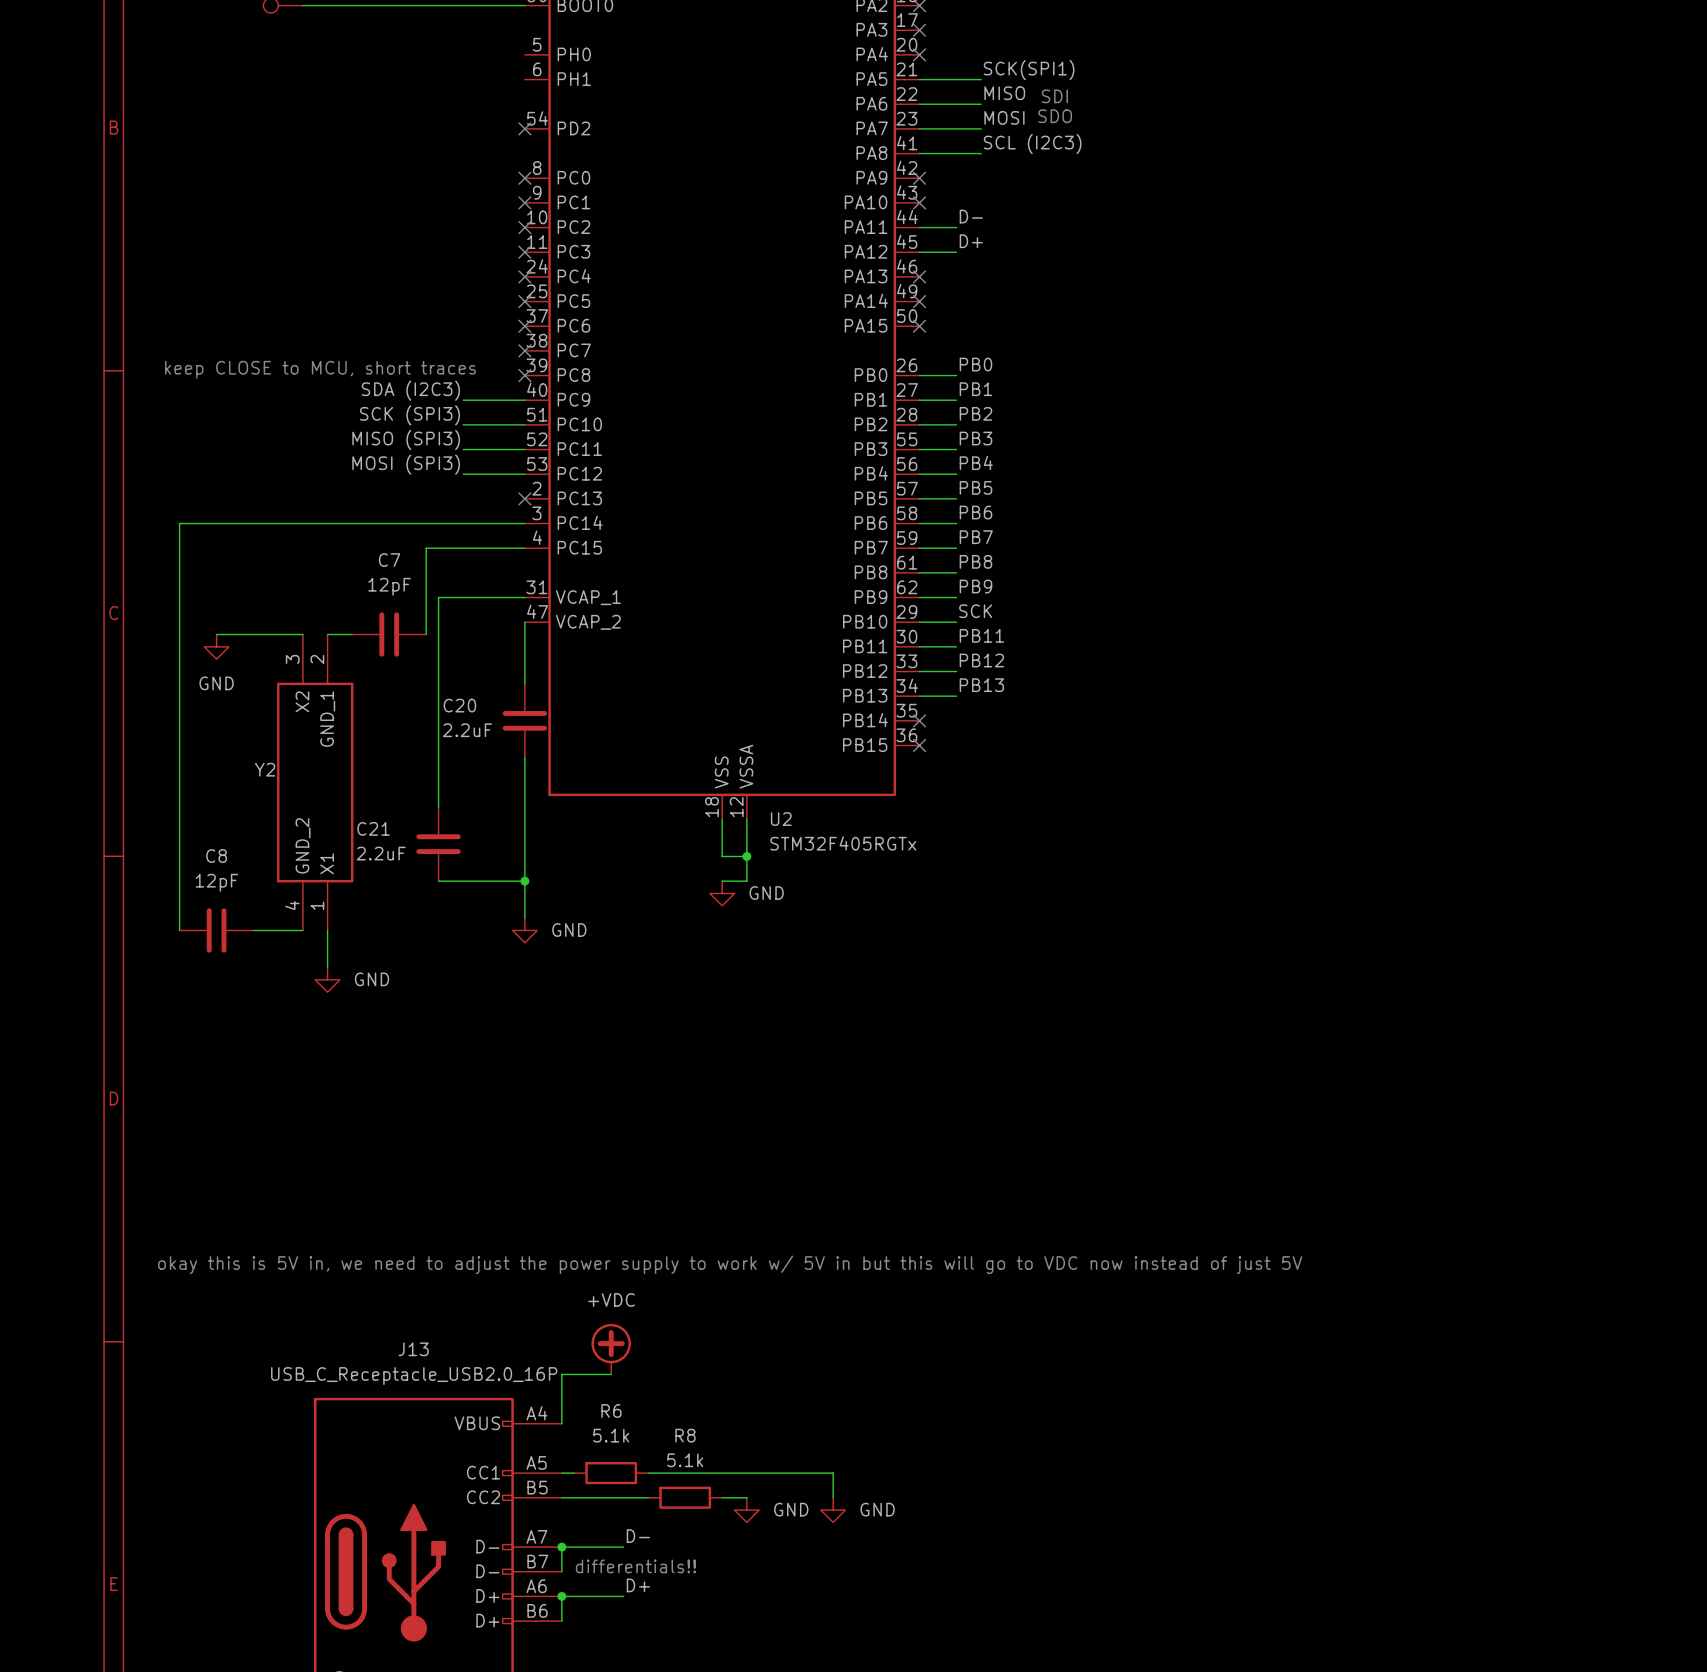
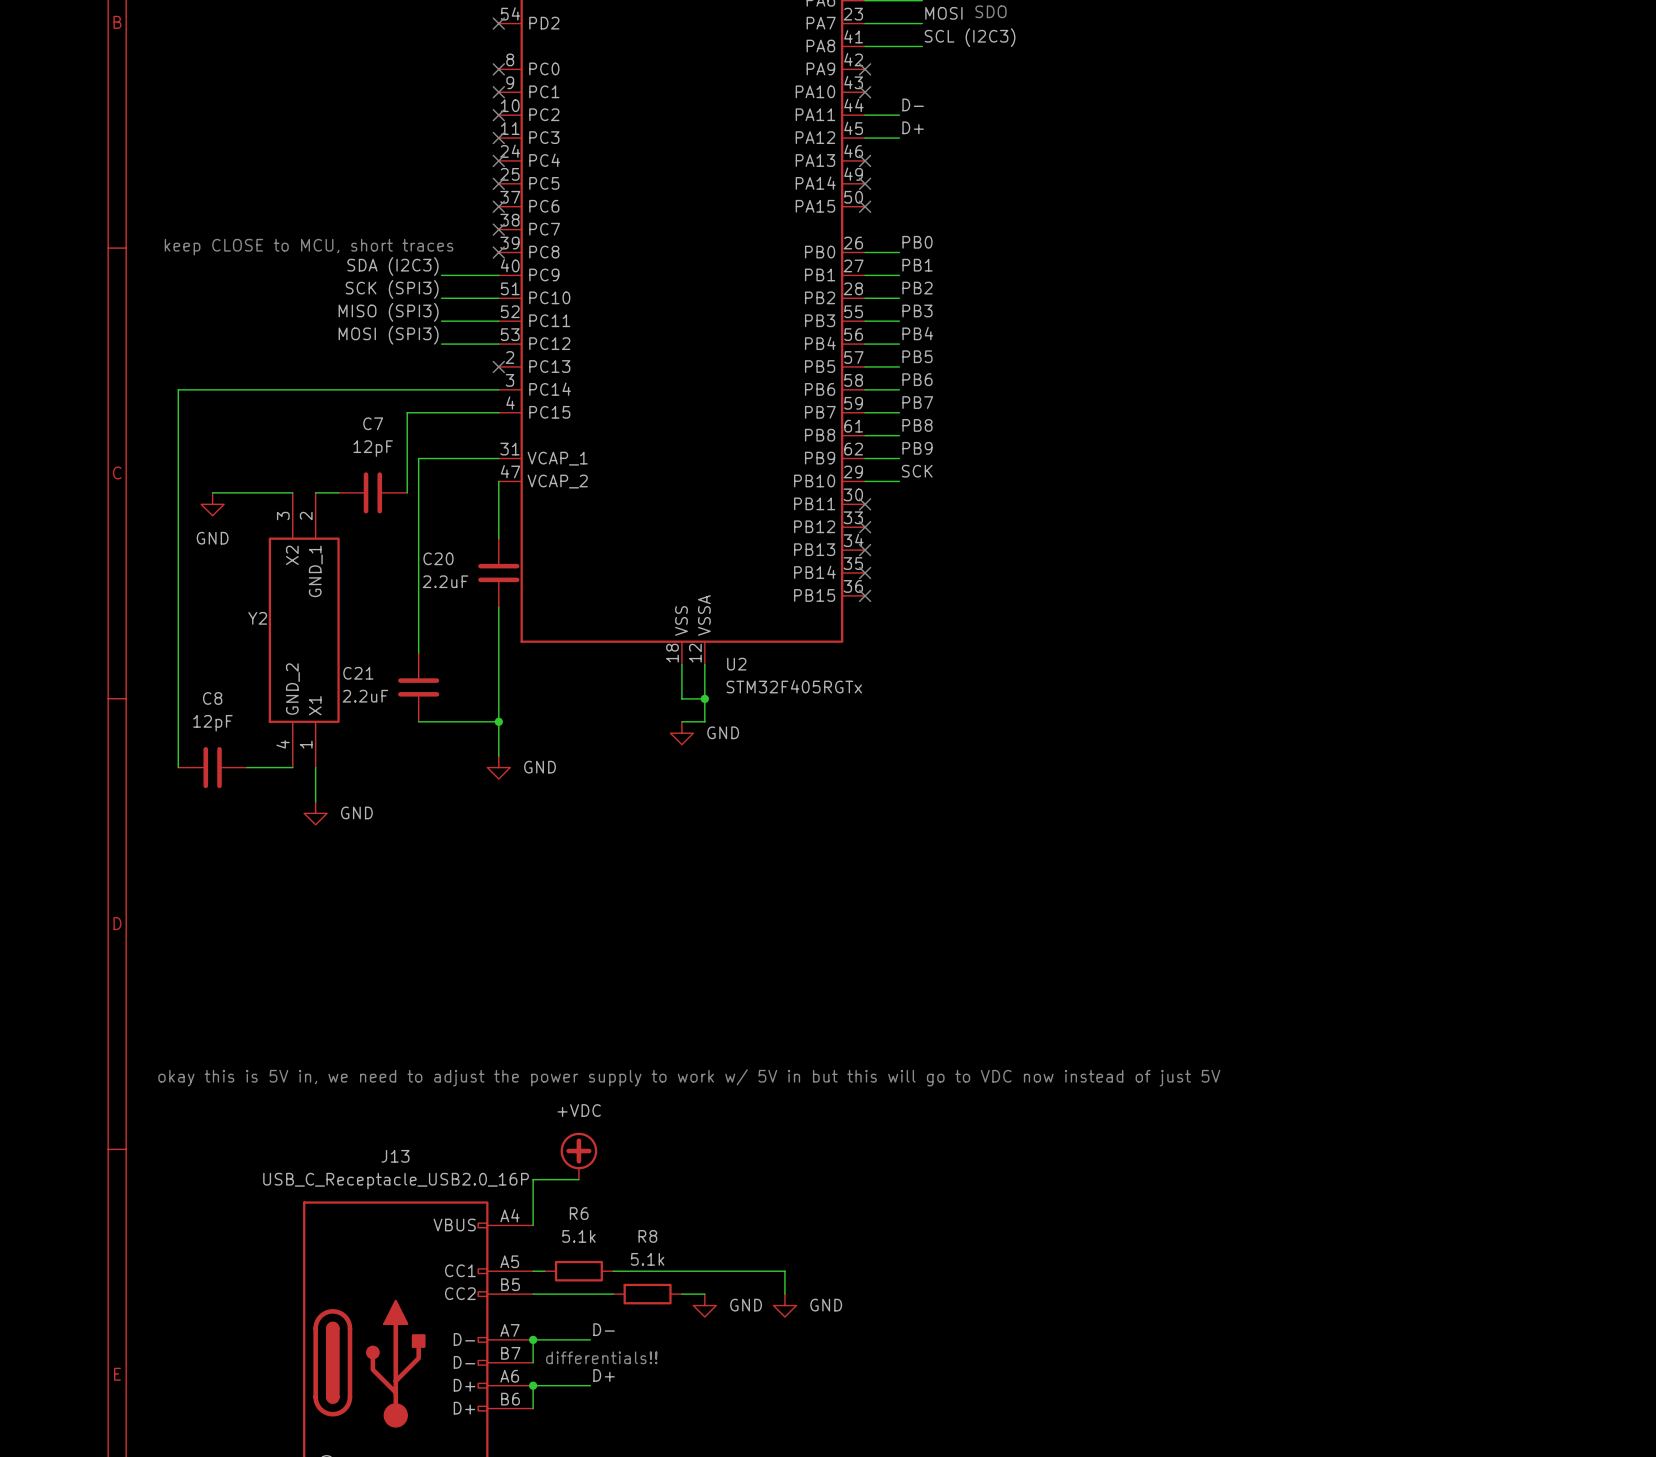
label: PB11 (981, 635) -> none
wire: (919, 646) (956, 646) -> none
no-connect mark: none -> (865, 504)
label: PB12 (981, 660) -> none
wire: (919, 671) (956, 671) -> none
no-connect mark: none -> (865, 527)
label: PB13 (981, 685) -> none
wire: (919, 696) (956, 696) -> none
no-connect mark: none -> (865, 550)

